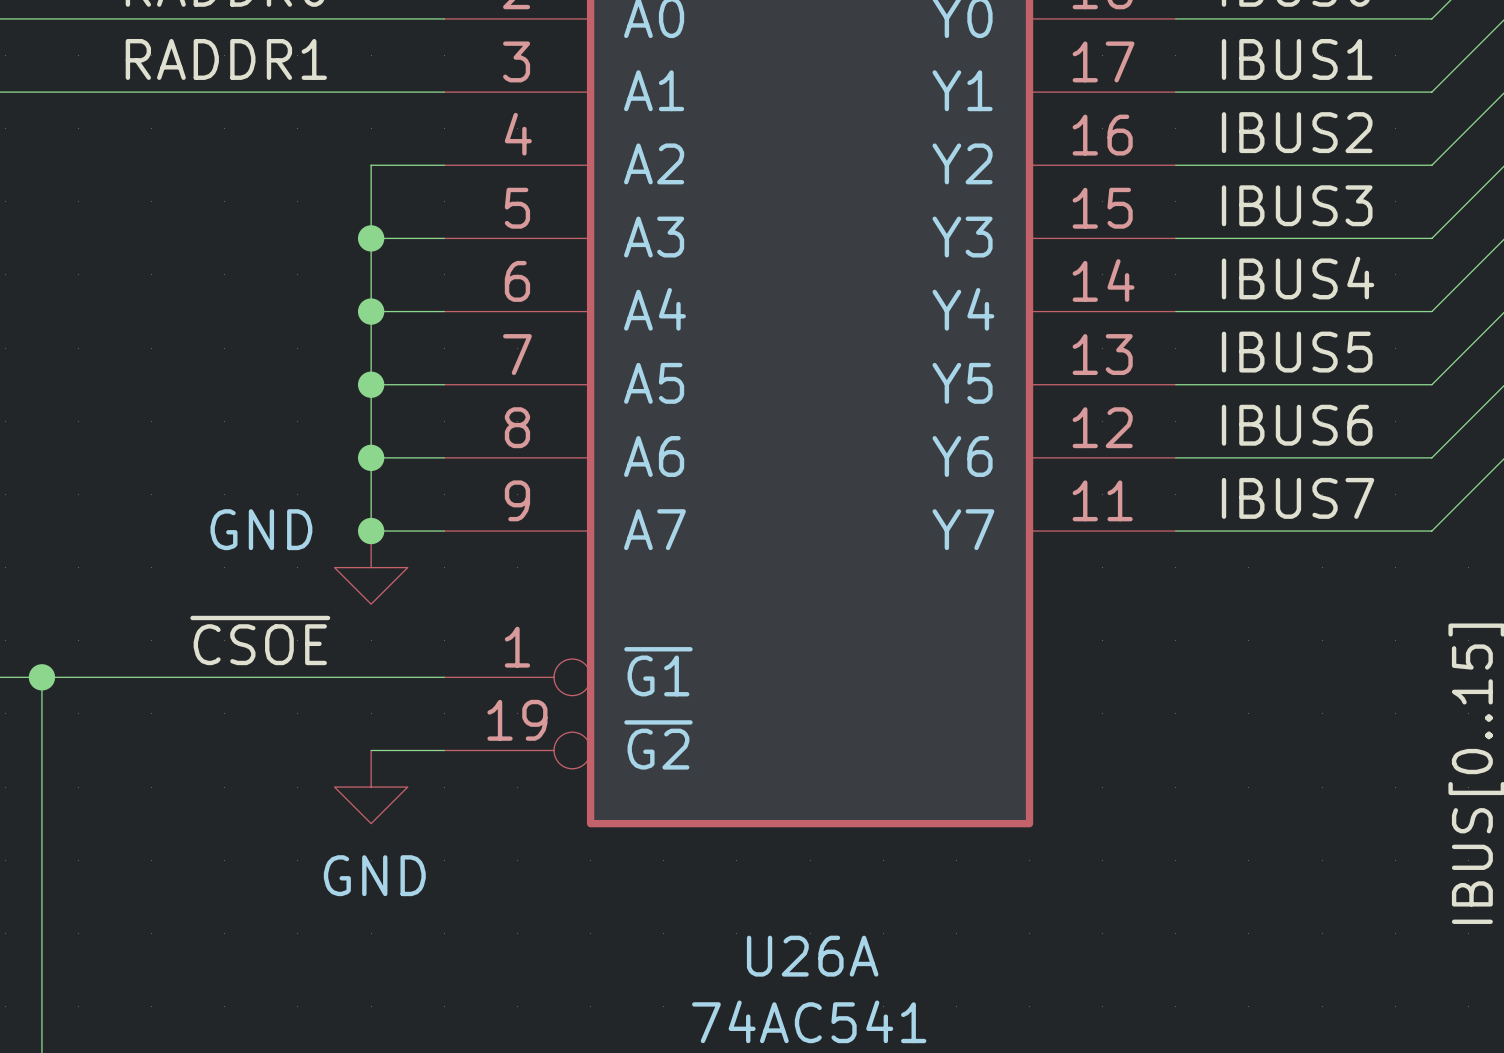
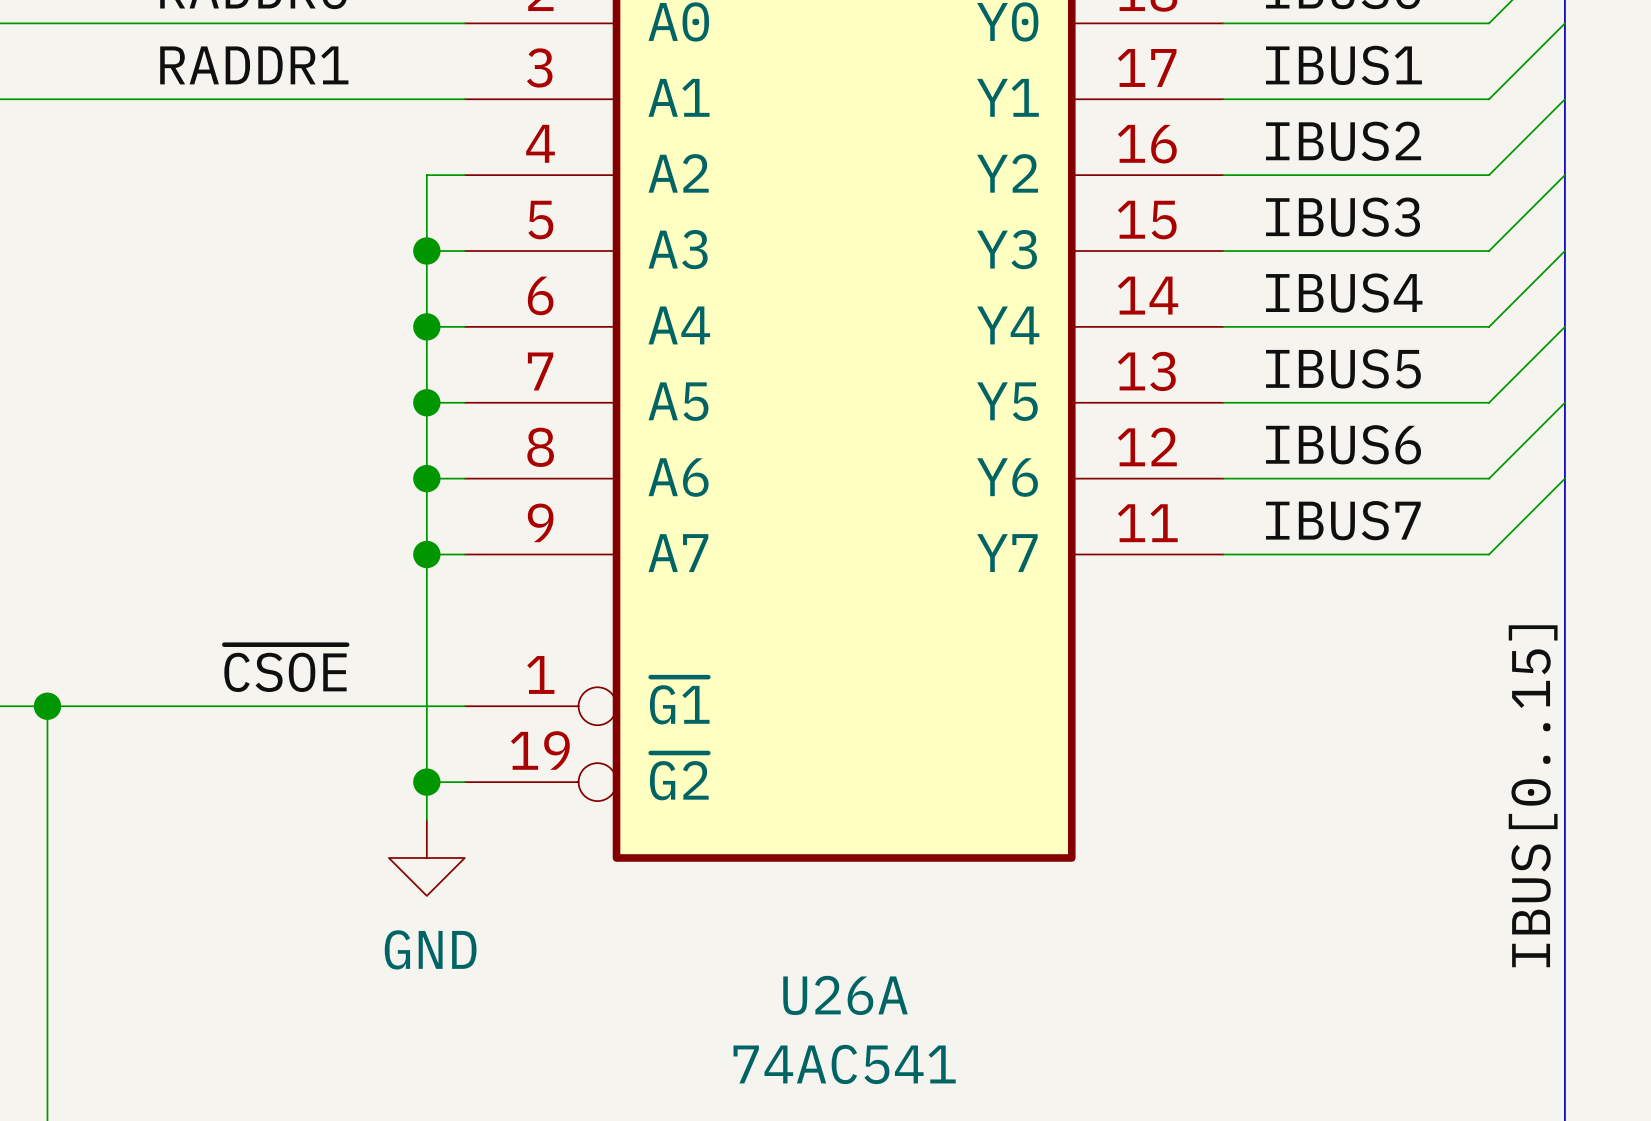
wire: (407, 165) (371, 165) (371, 531) (407, 531) -> (426, 175) (426, 820)
wire: (371, 238) (407, 238) -> none
junction position: (371, 238) -> (426, 251)
wire: (371, 311) (407, 311) -> none
junction position: (371, 311) -> (426, 326)
wire: (371, 384) (407, 384) -> none
junction position: (371, 384) -> (426, 402)
wire: (371, 457) (407, 457) -> none
junction position: (371, 457) -> (426, 478)
junction position: (371, 531) -> (426, 554)
power symbol: GND (371, 567) -> none
wire: (371, 750) (407, 750) -> none
junction: none -> (426, 782)
power symbol position: GND (371, 787) -> GND (426, 857)

